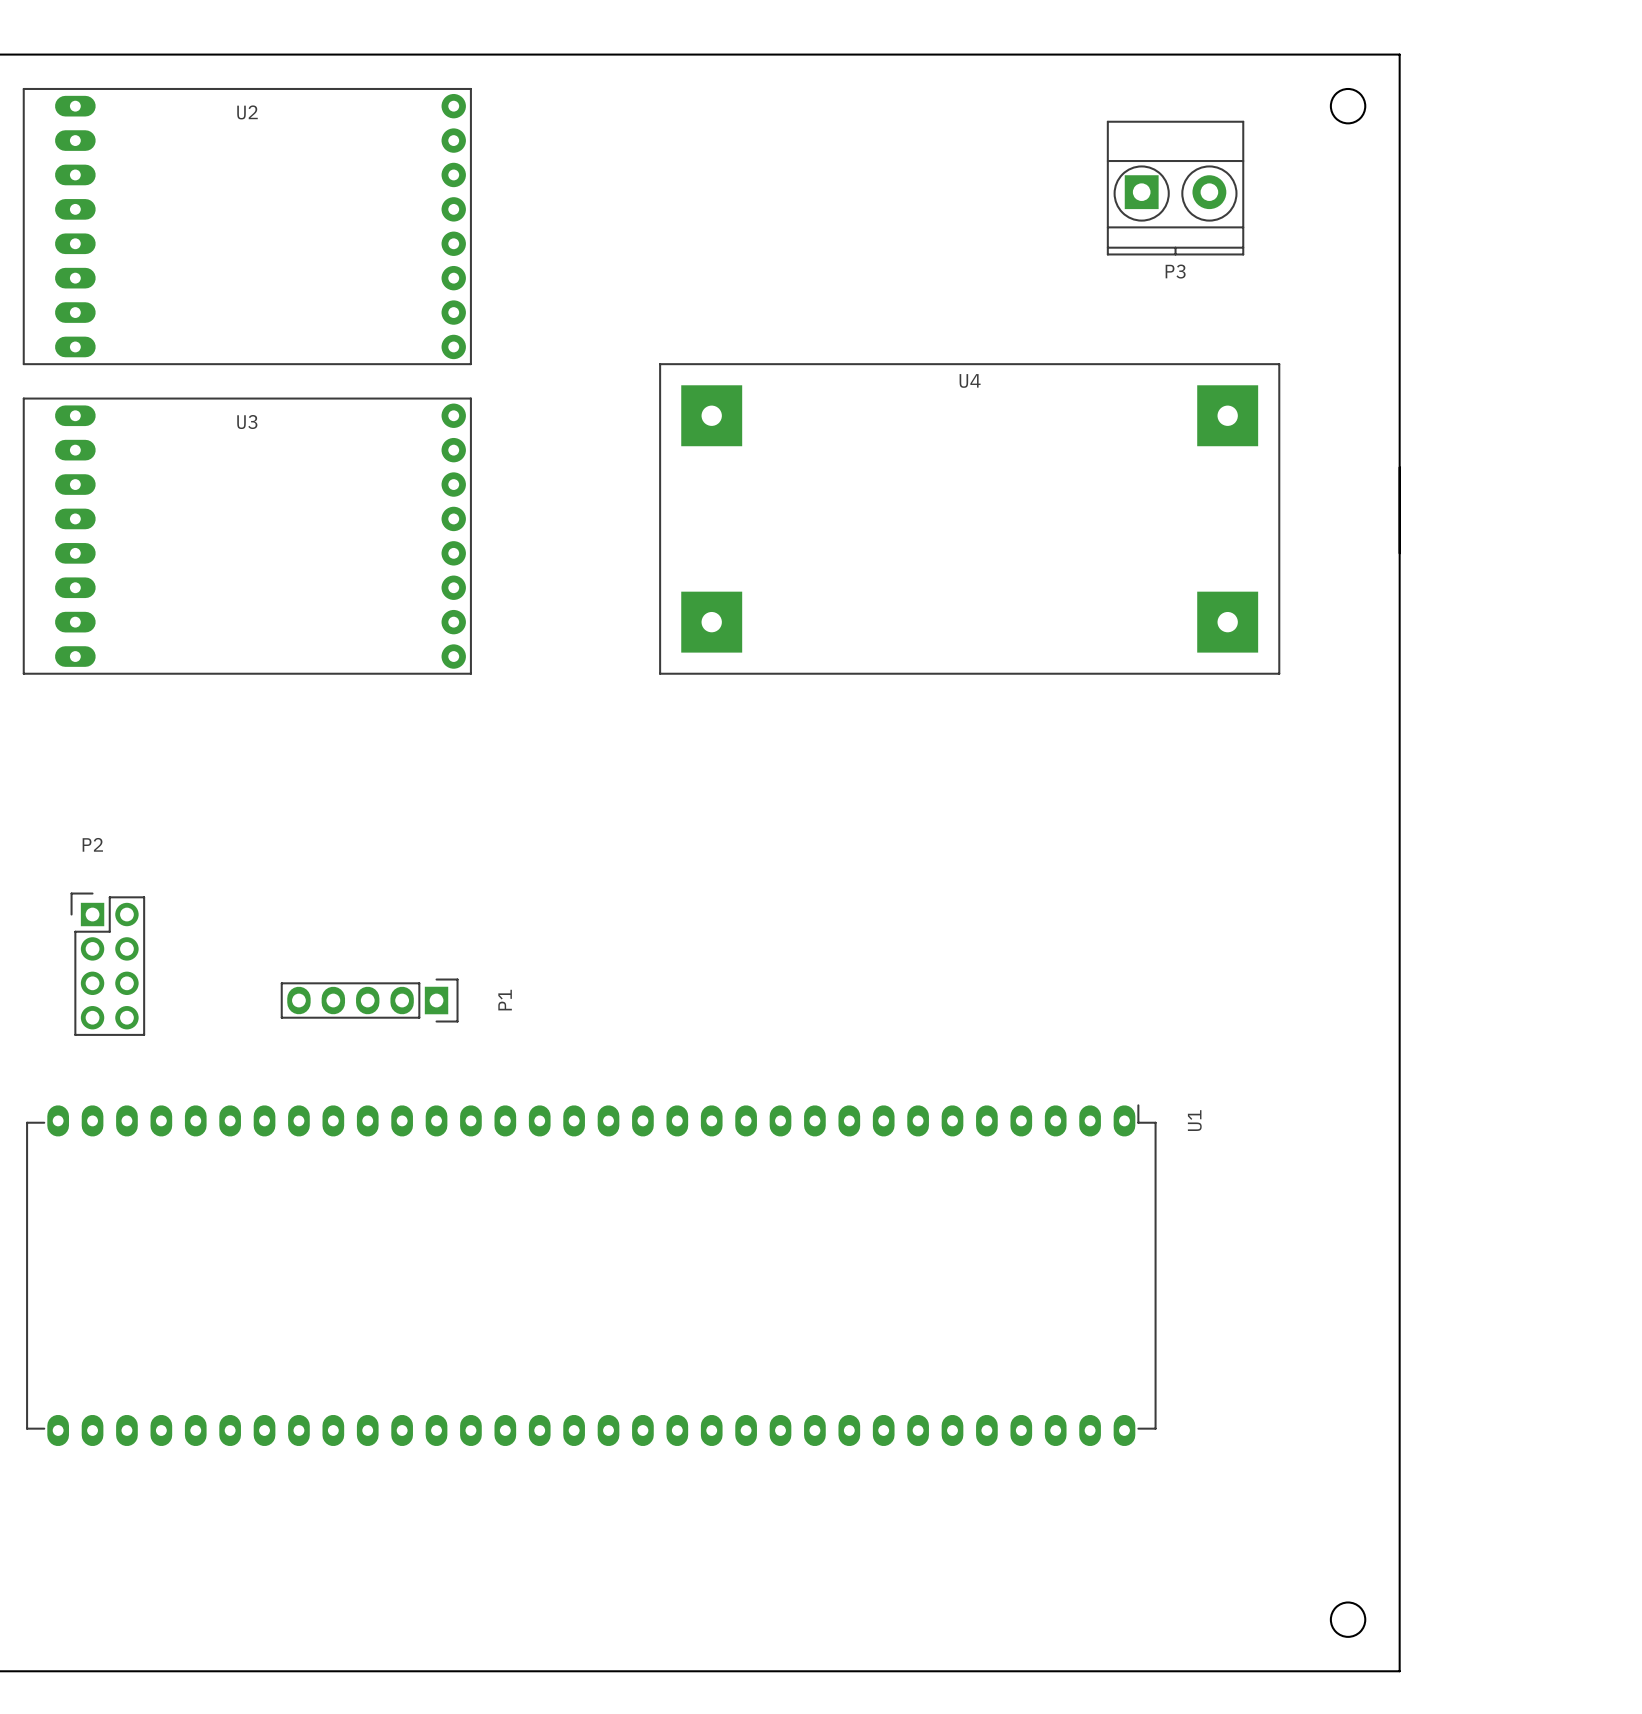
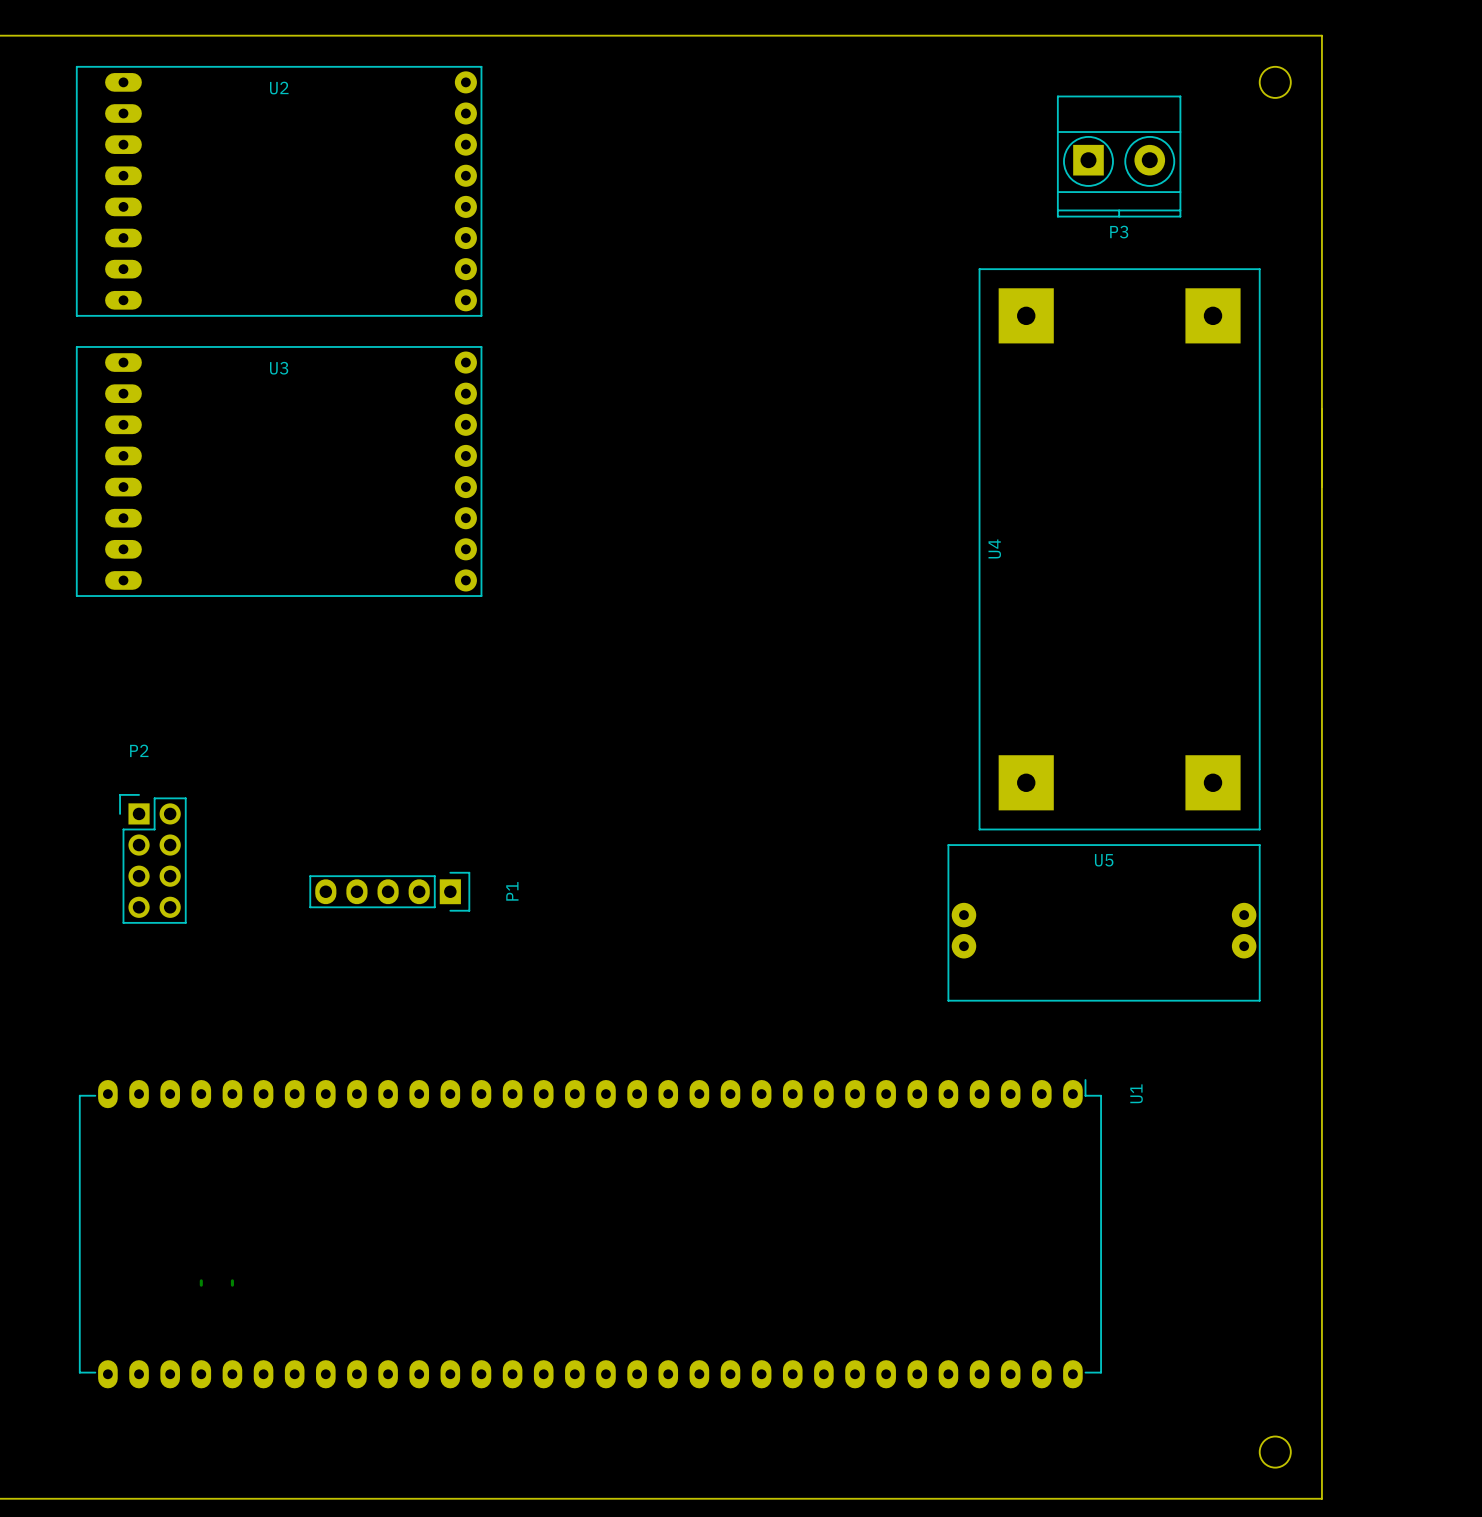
U4 name position: U4 (970, 380) -> U4 (994, 548)
U4 rotation: 0° (969, 518) -> 90° clockwise (1119, 549)
U5: none -> (1104, 922)
U1 position: (591, 1275) -> (590, 1233)

